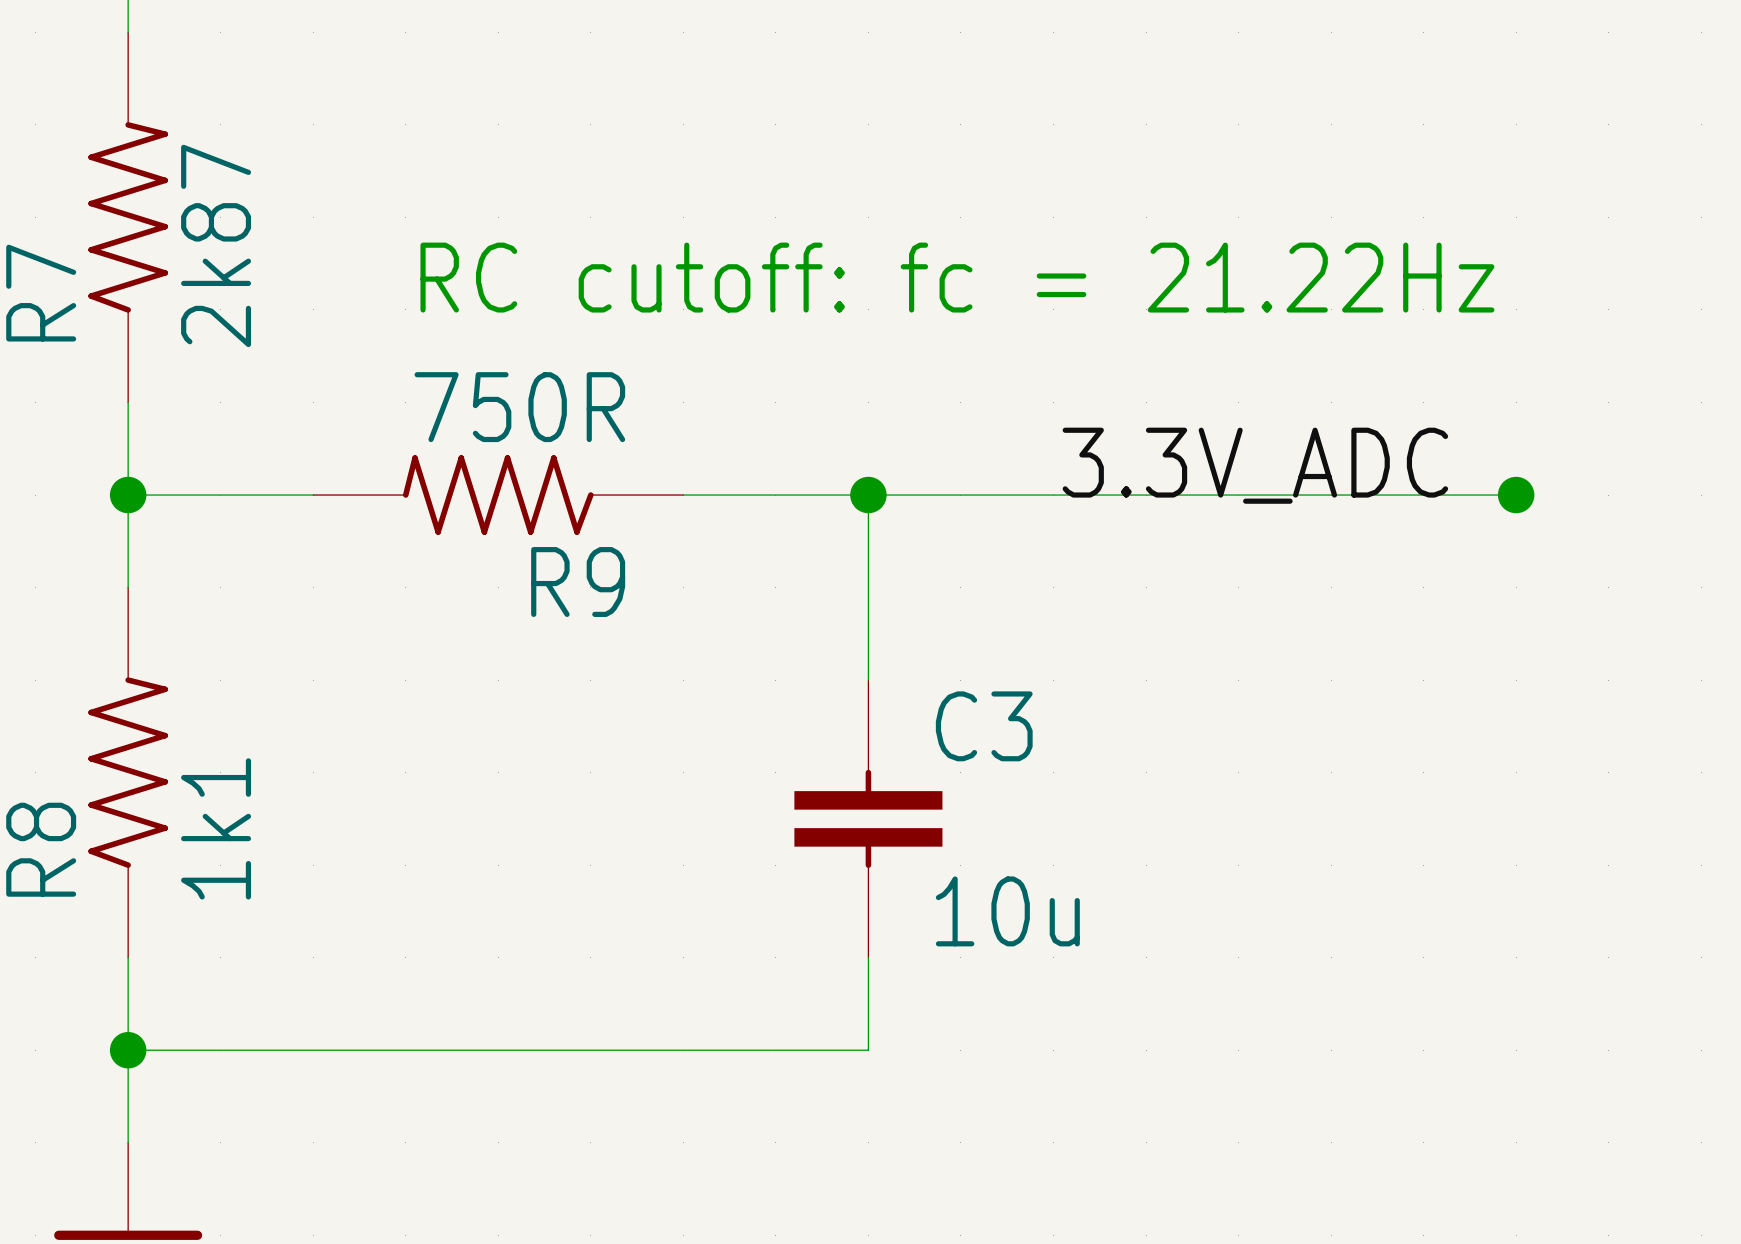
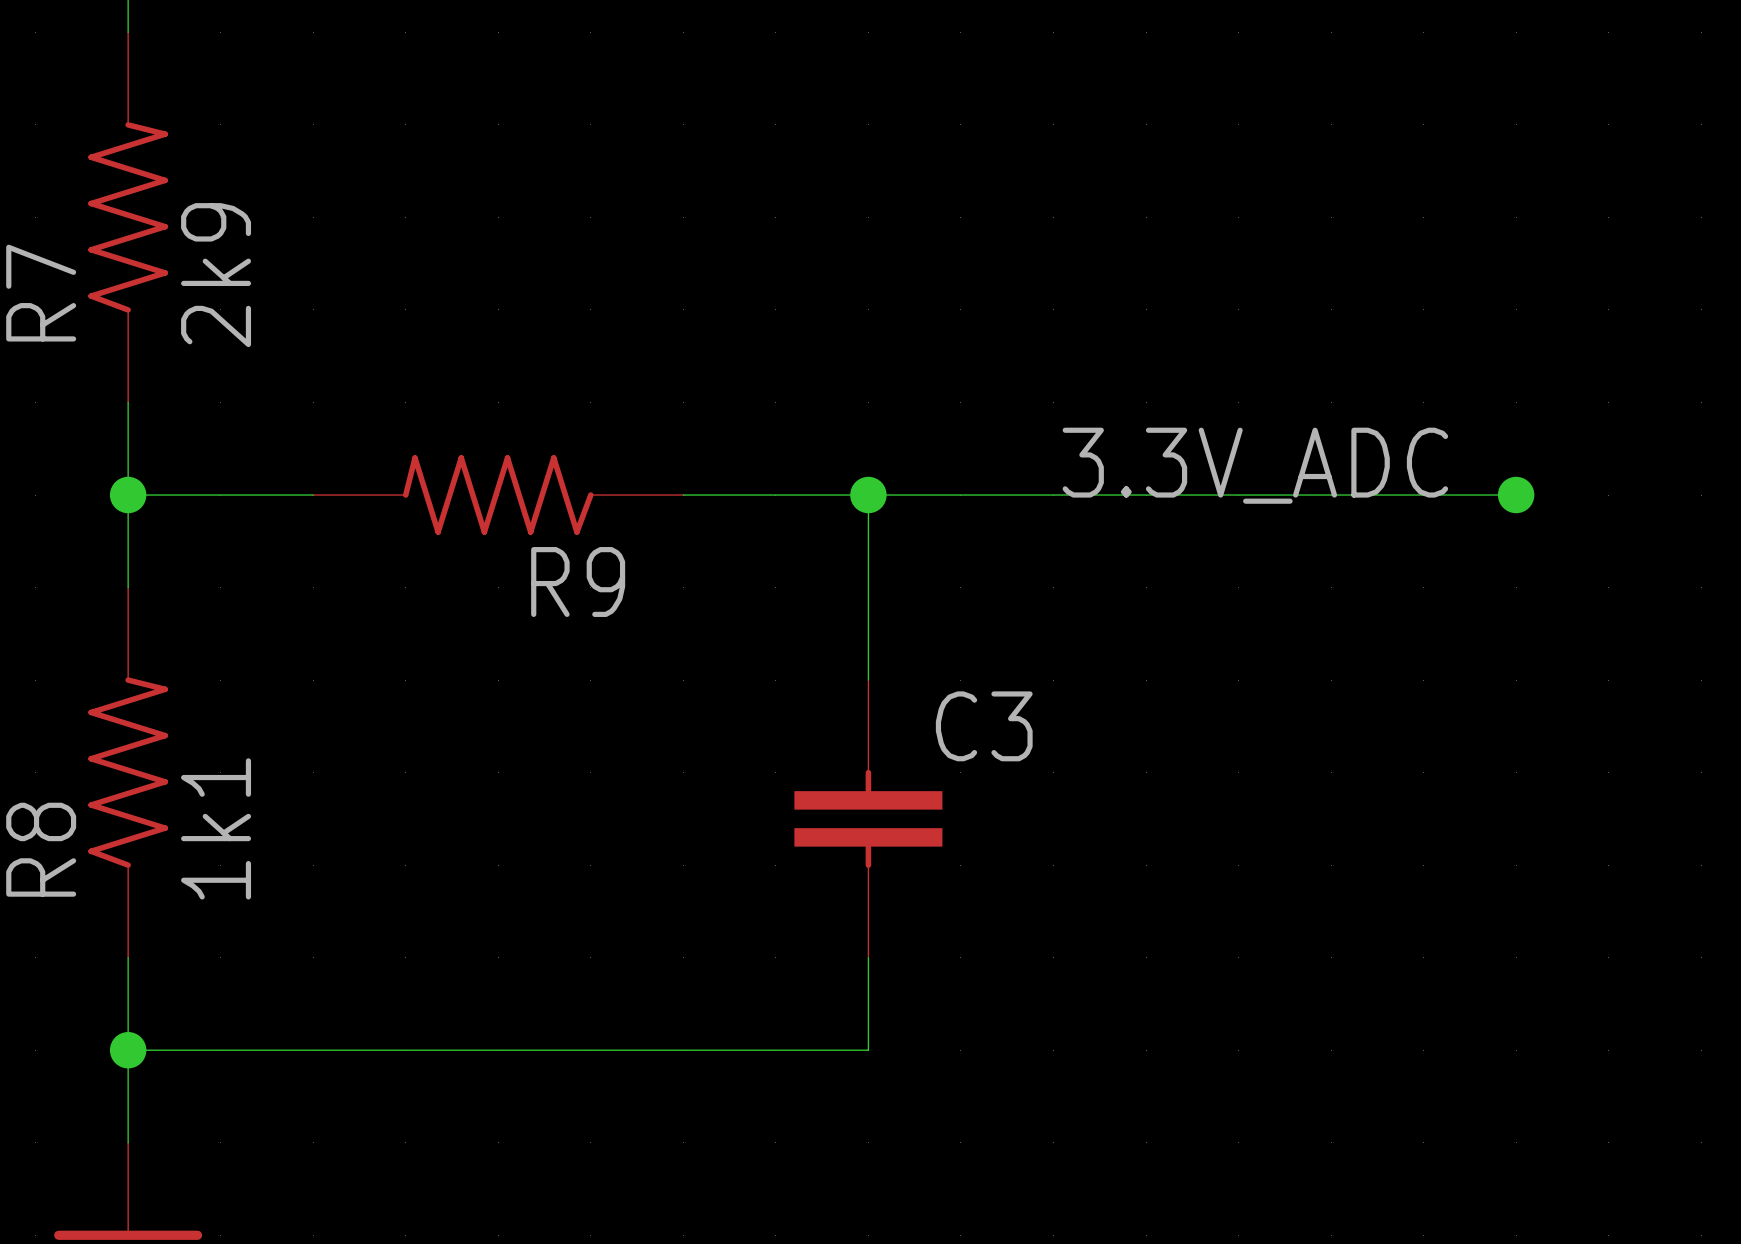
R7 value: 2k87 (216, 245) -> 2k9 (216, 275)
text: RC cutoff: fc = 21.22Hz (957, 277) -> none
R9 value: 750R (519, 407) -> none
C3 value: 10u (1007, 911) -> none

